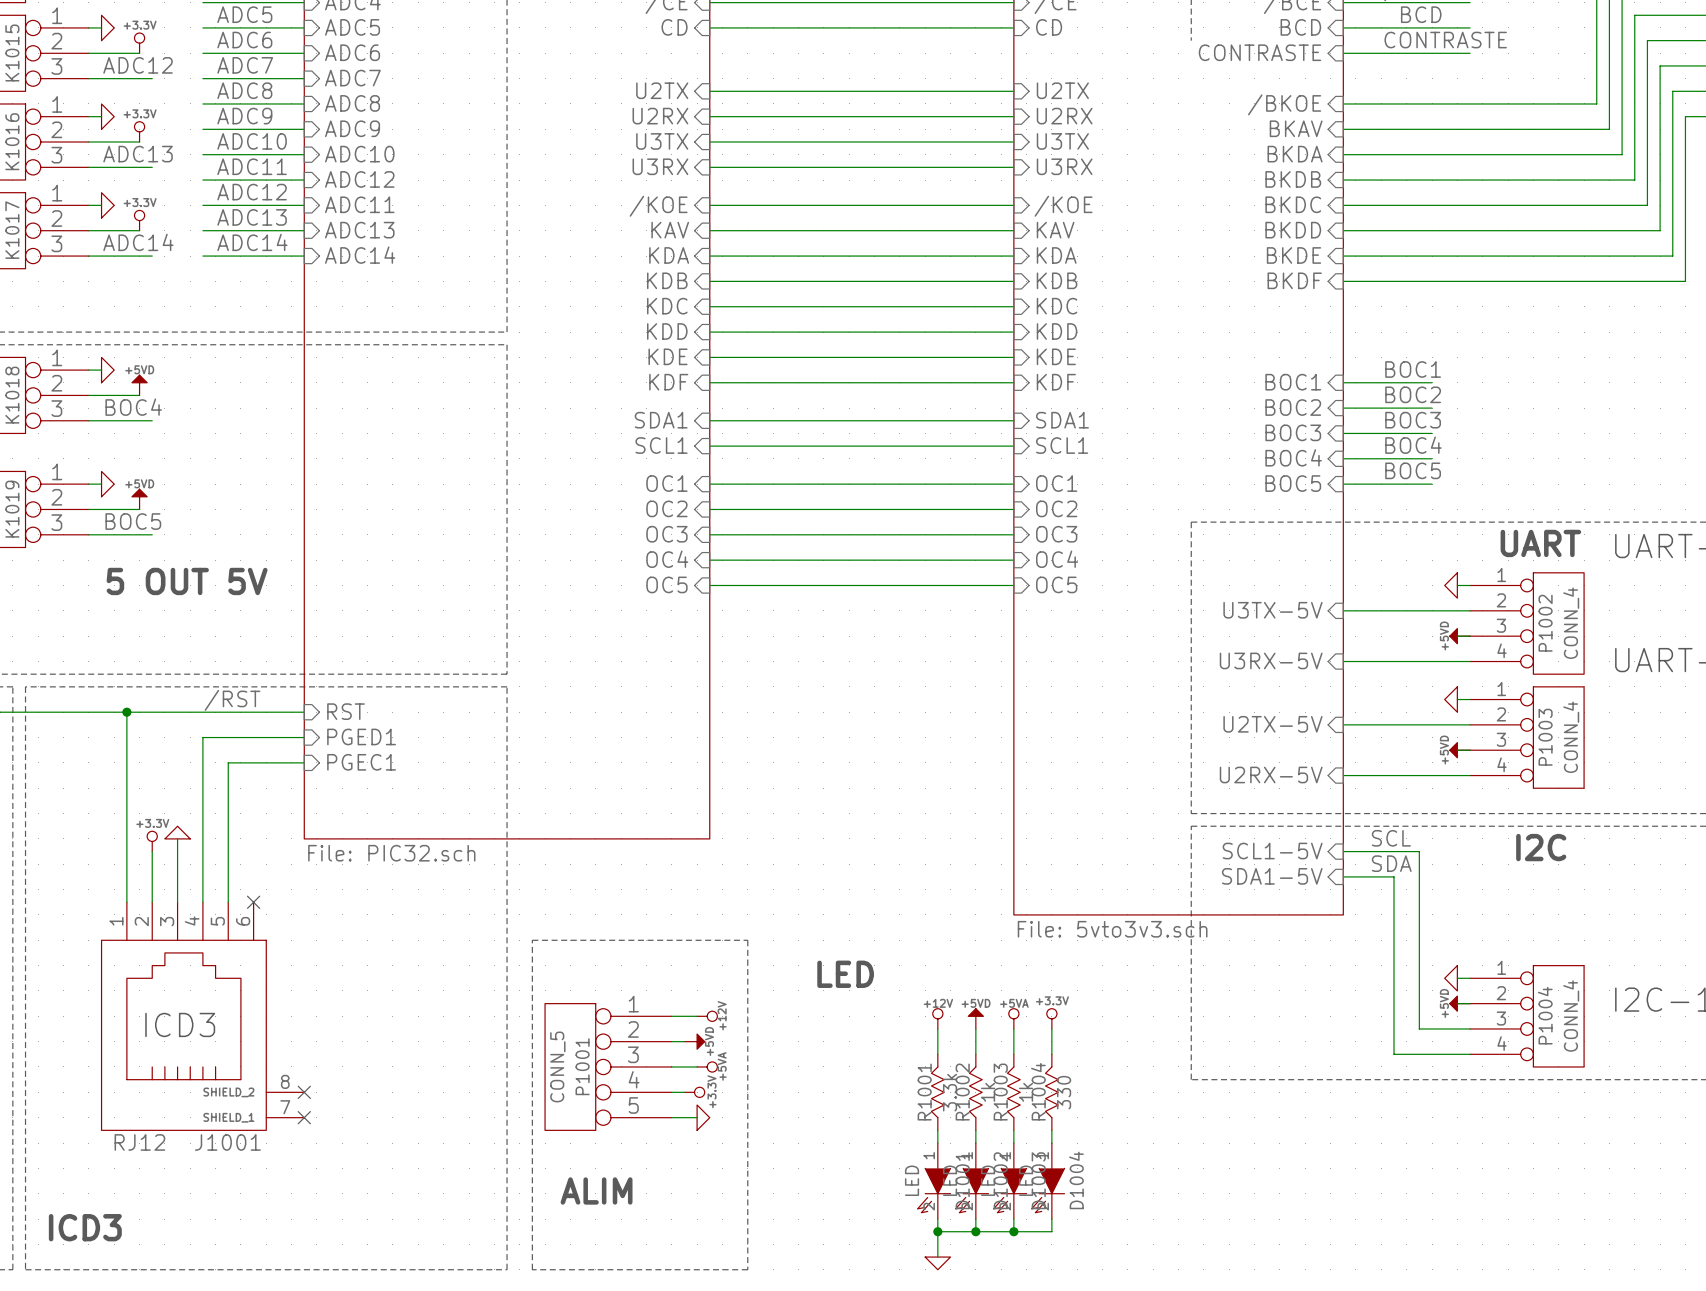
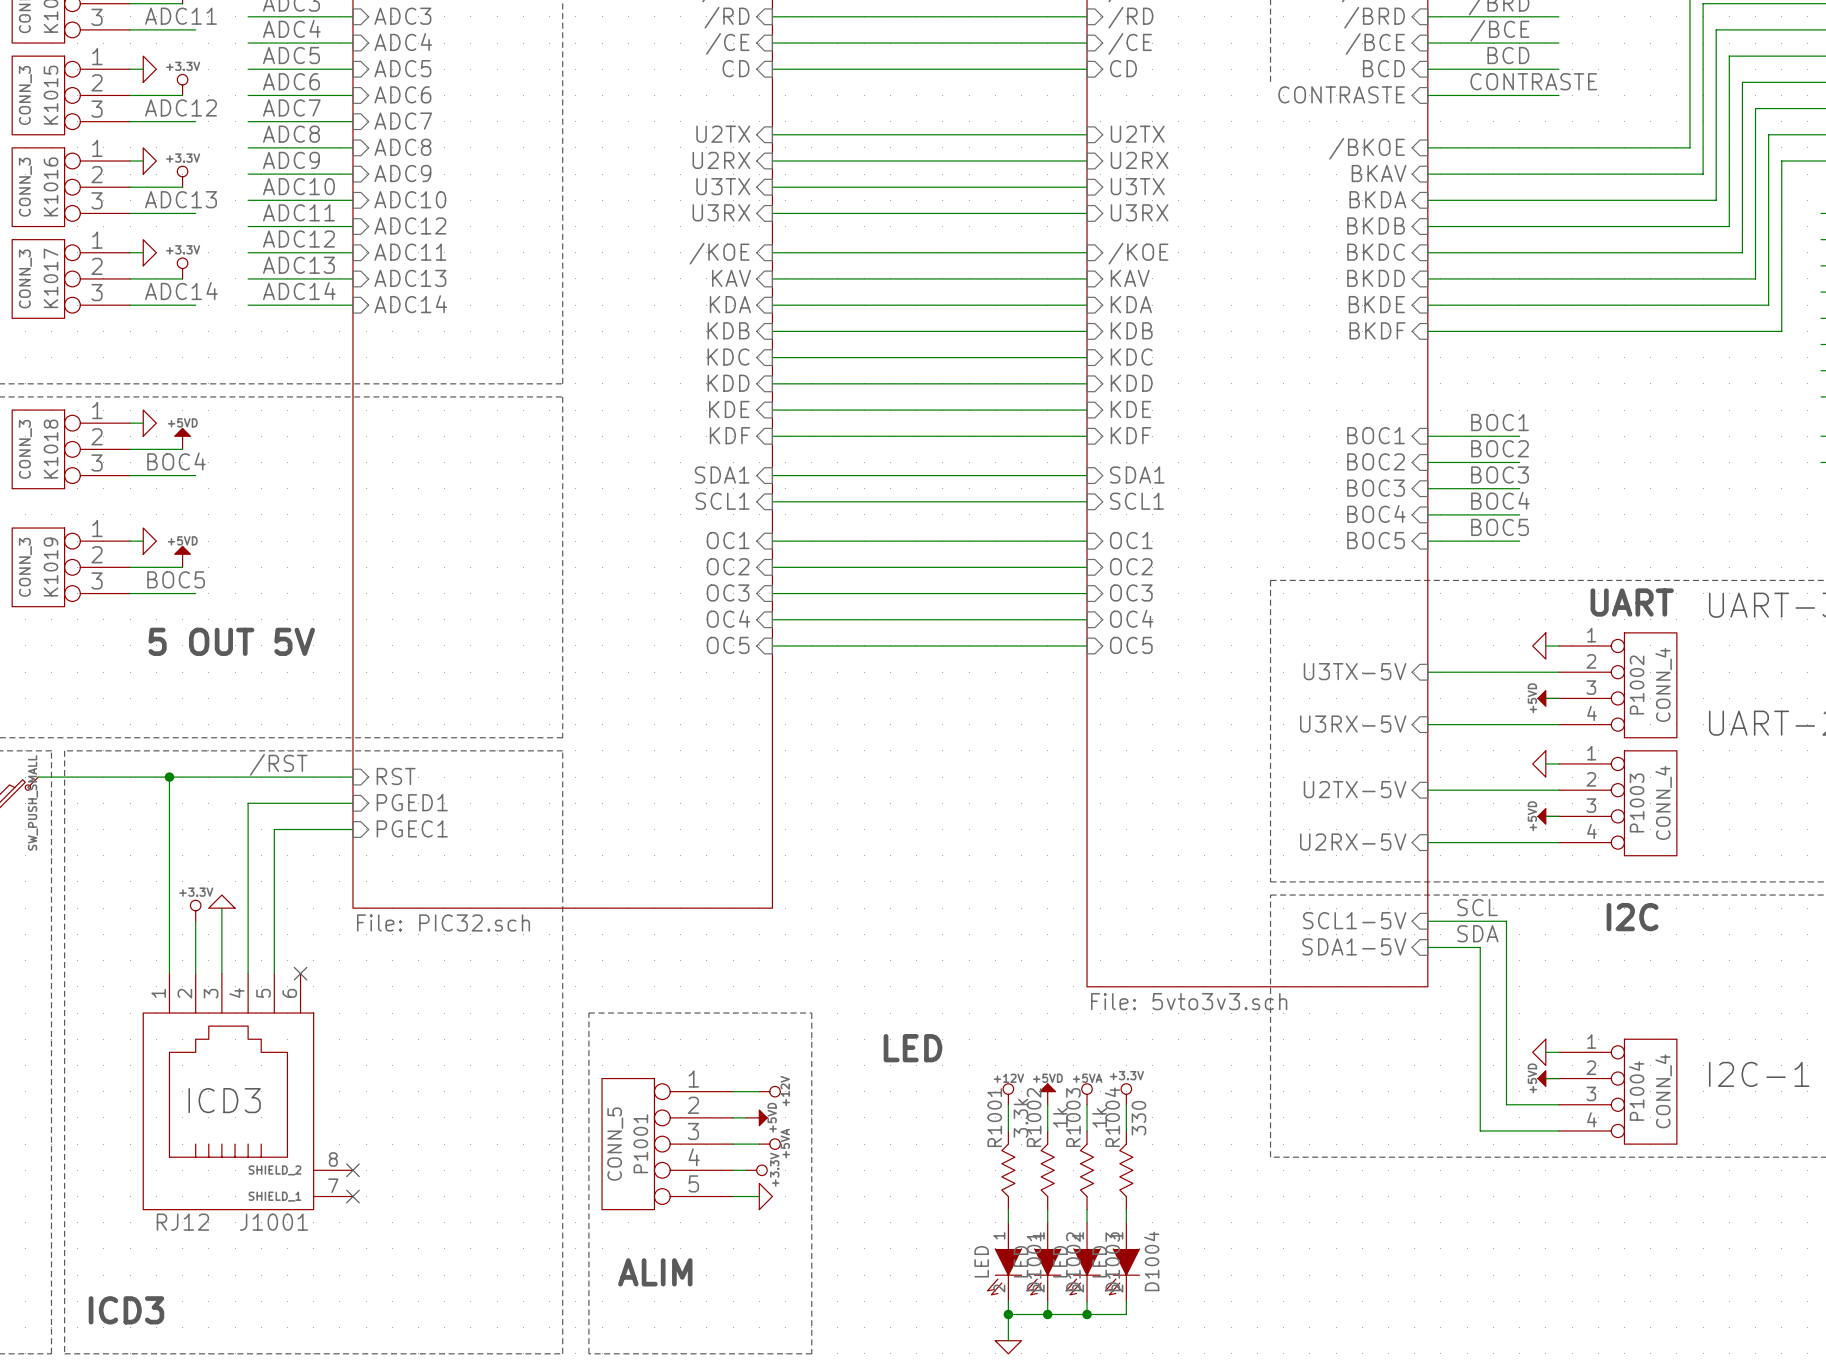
R1004 name position: R1004 (1038, 1091) -> R1004 (1112, 1117)
R1001 name position: R1001 (924, 1092) -> R1001 (994, 1117)
R1001 value position: 3.3k (950, 1092) -> 3.3k (1020, 1118)
R1002 name position: R1002 (962, 1092) -> R1002 (1034, 1117)
R1002 value position: 1k (988, 1092) -> 1k (1060, 1117)
R1003 name position: R1003 (1000, 1092) -> R1003 (1073, 1117)
R1003 value position: 1k (1026, 1092) -> 1k (1099, 1117)
R1004 value position: 330 (1064, 1092) -> 330 (1138, 1118)

